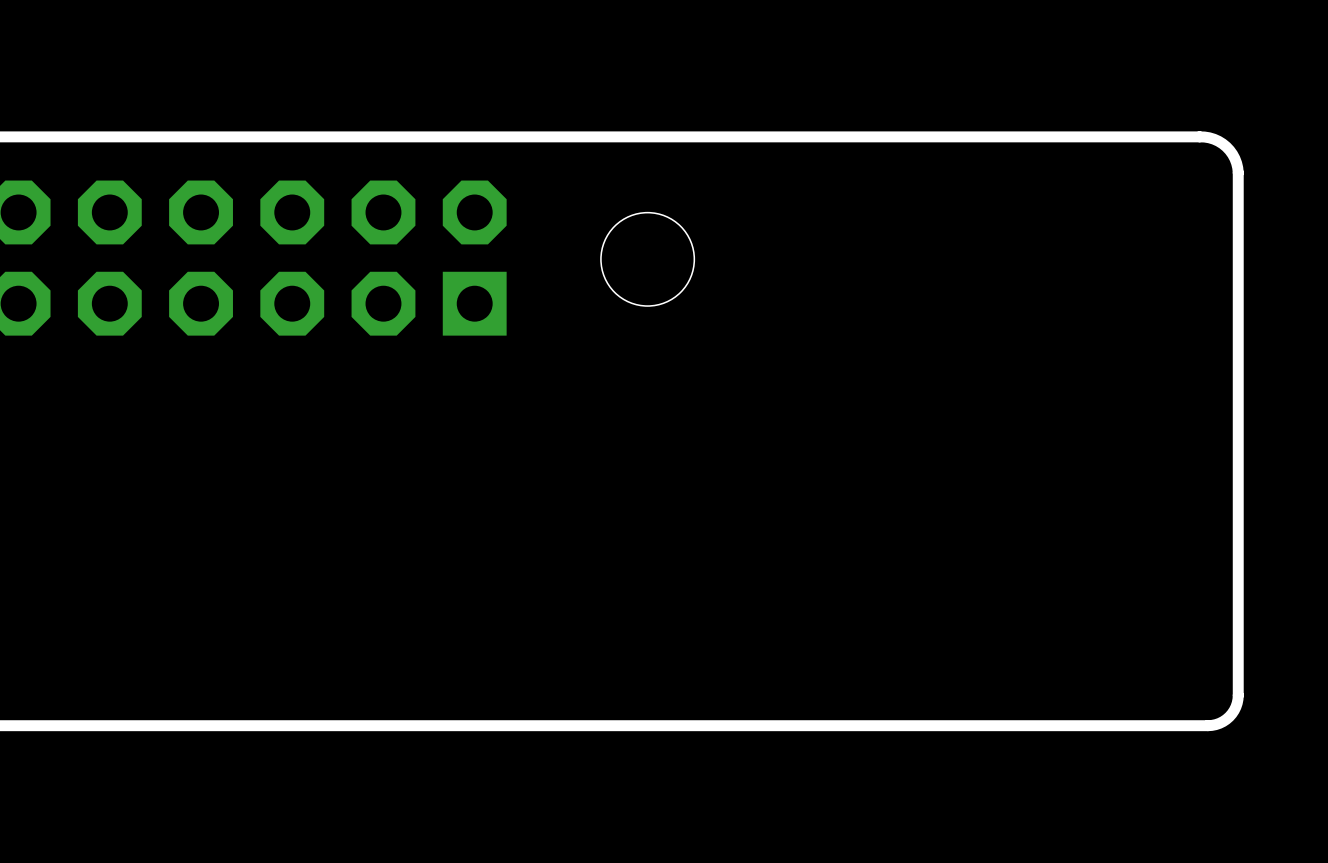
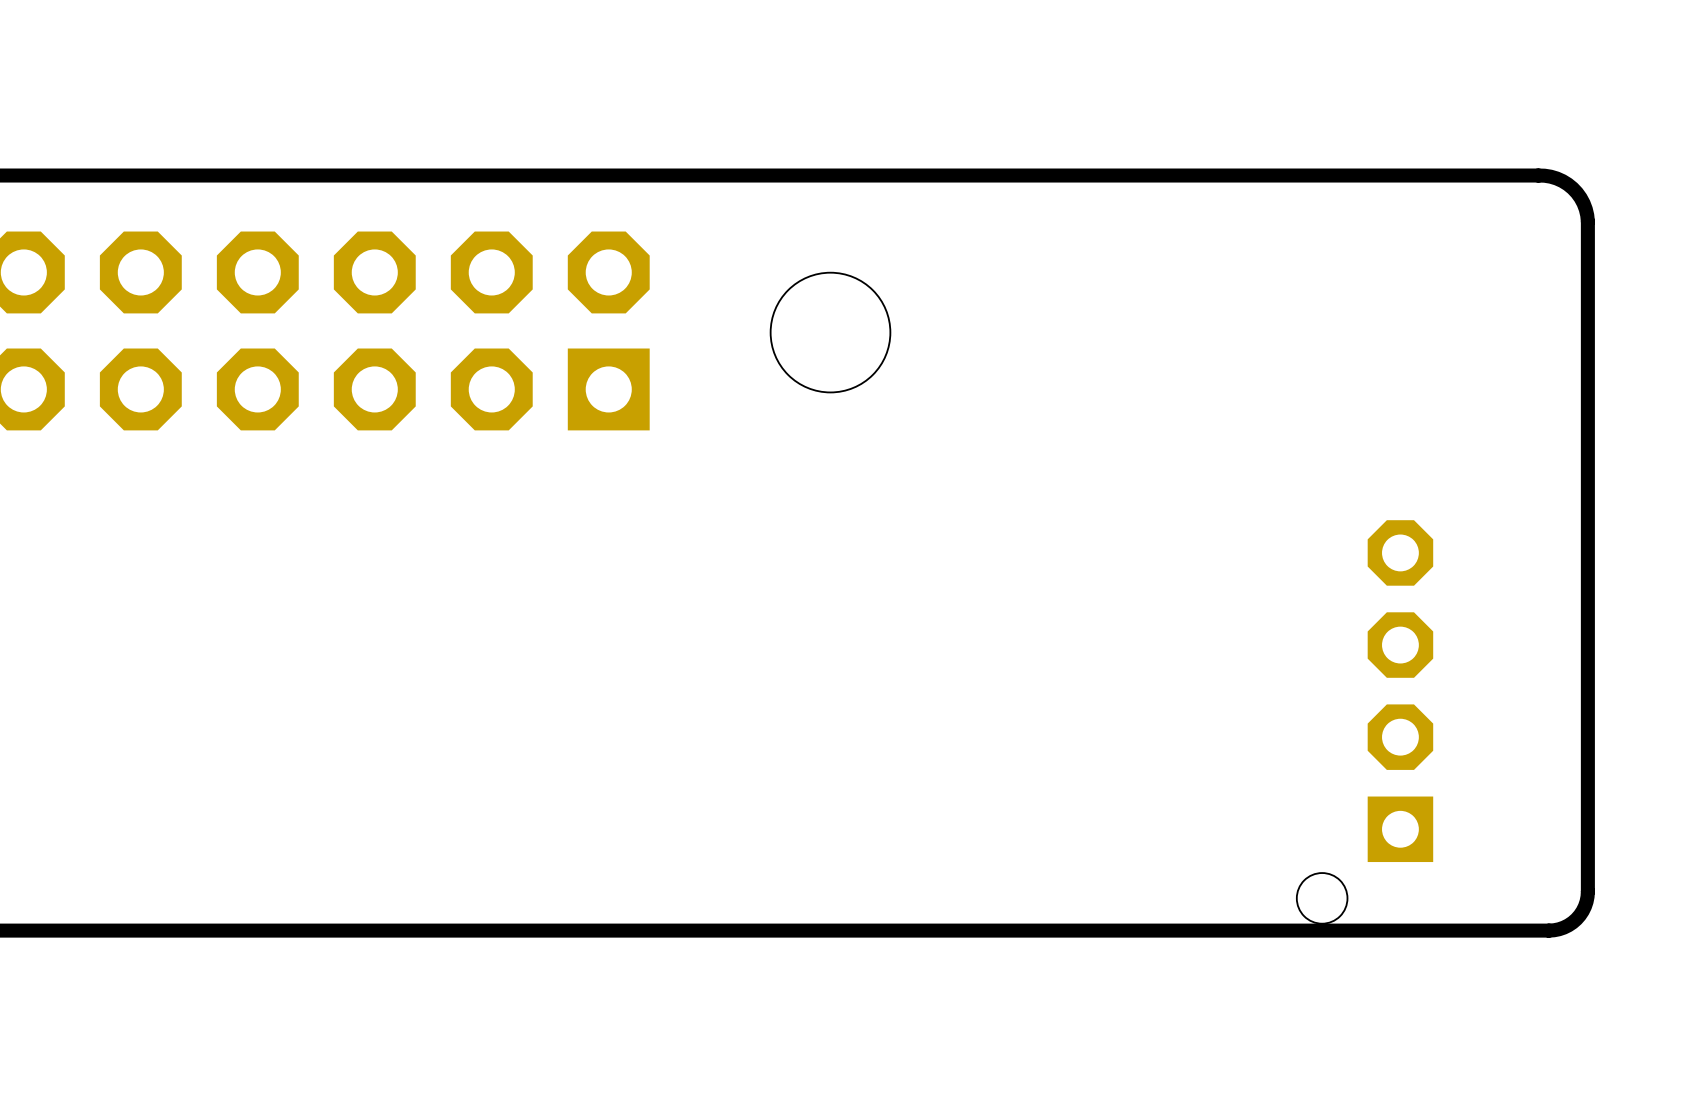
part: none -> (1365, 721)

